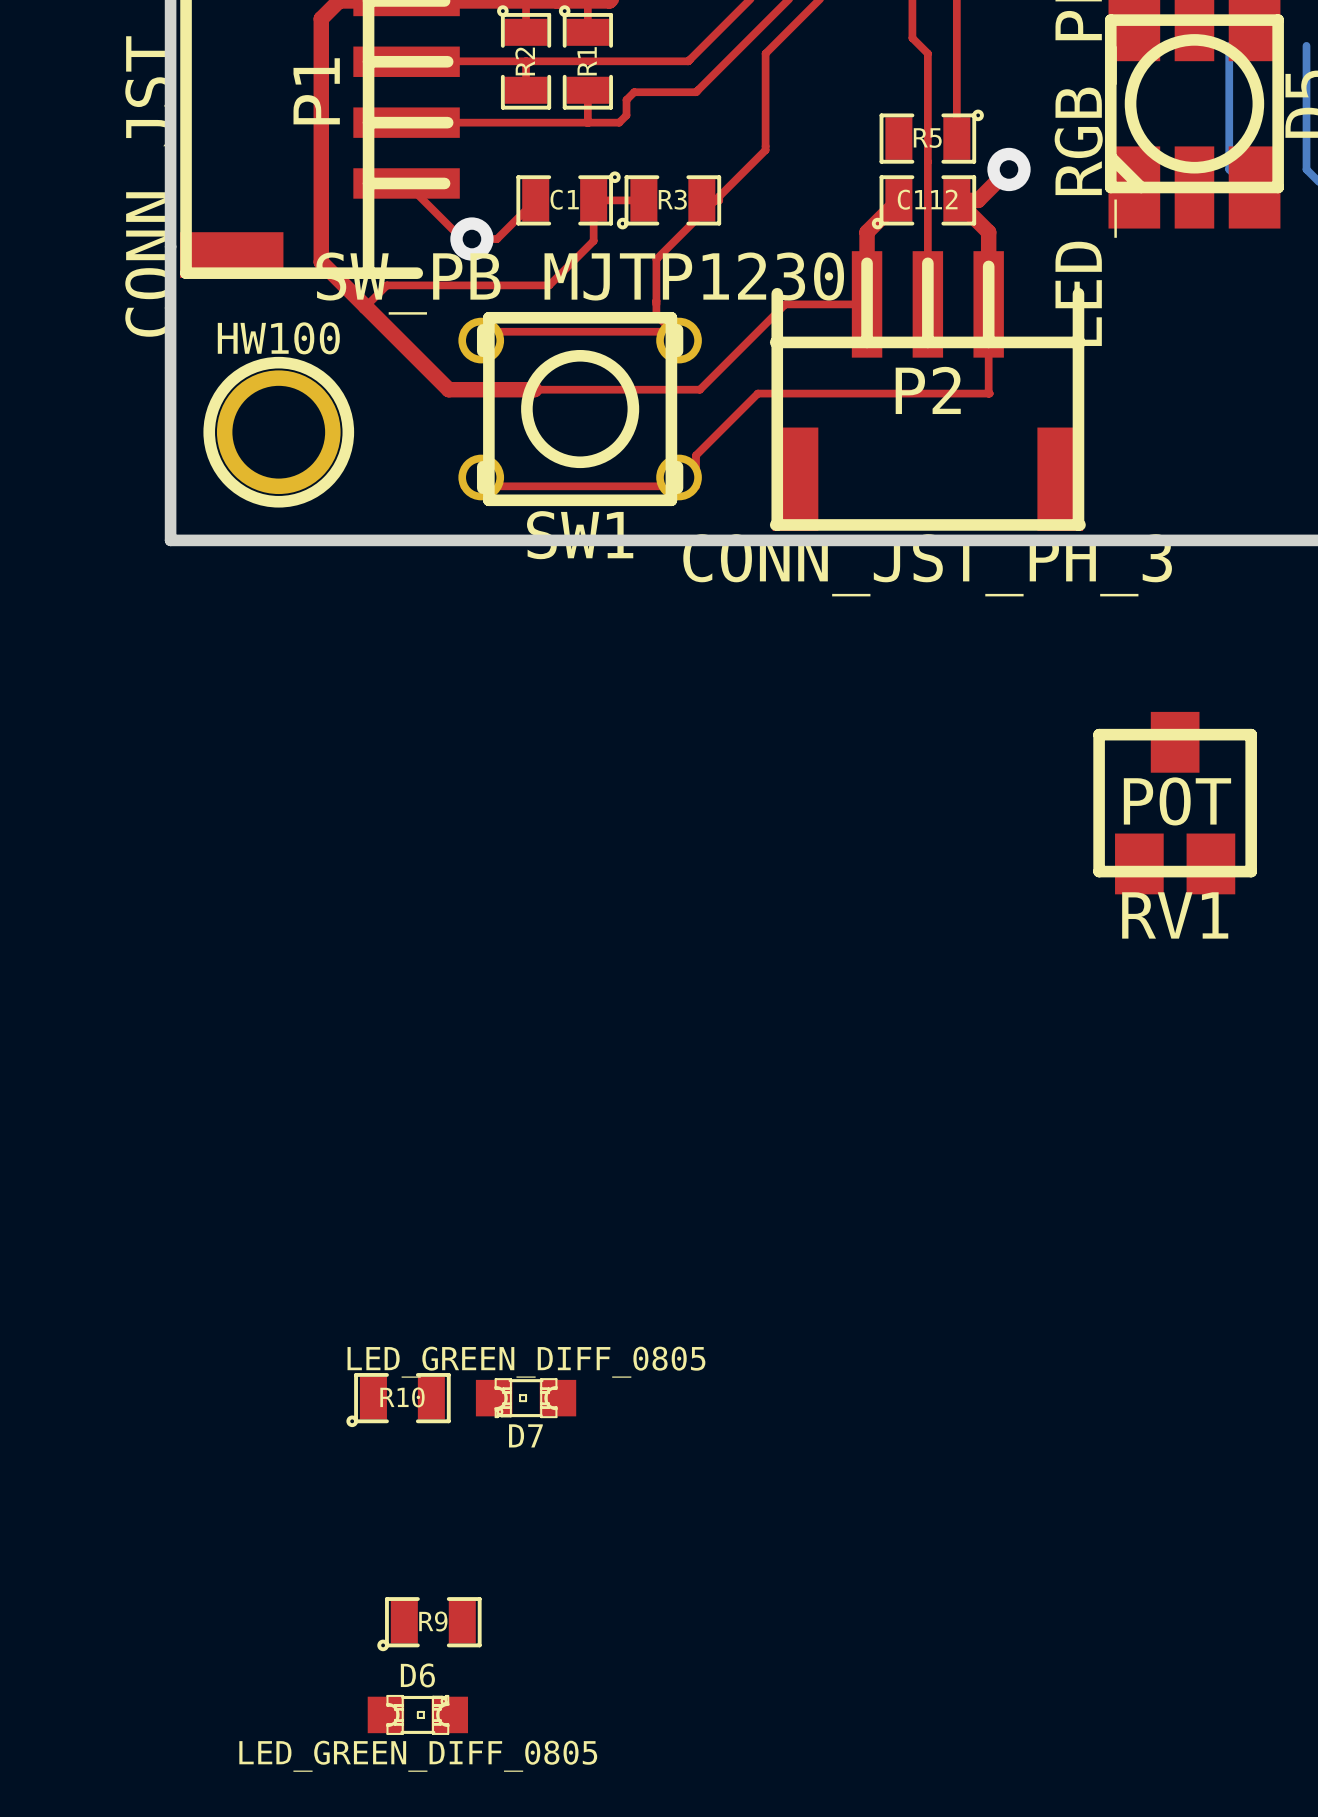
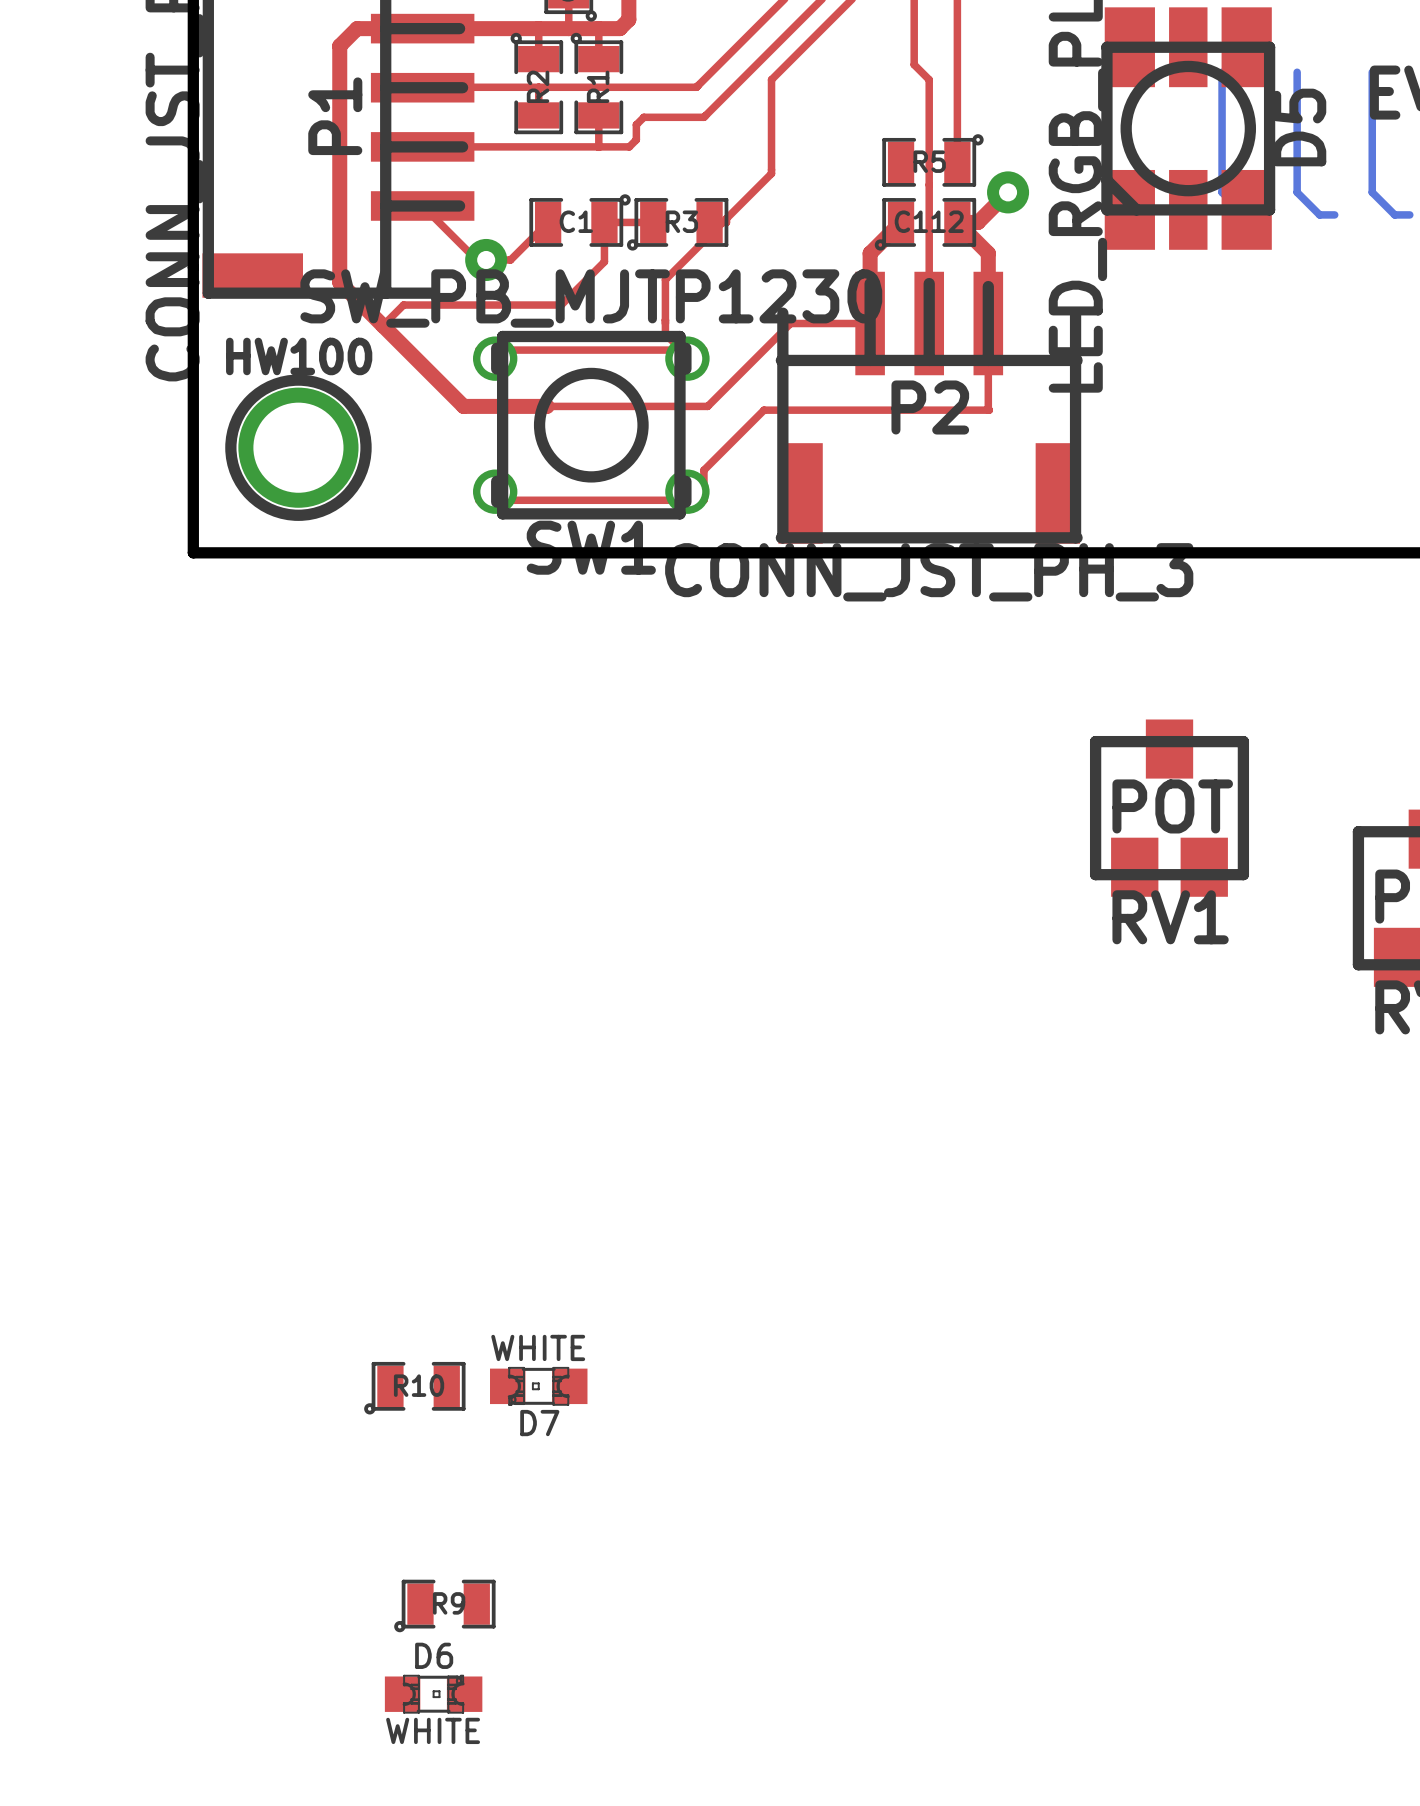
D7 value: LED_GREEN_DIFF_0805 (526, 1362) -> WHITE (538, 1347)
D6 value: LED_GREEN_DIFF_0805 (418, 1756) -> WHITE (433, 1730)

